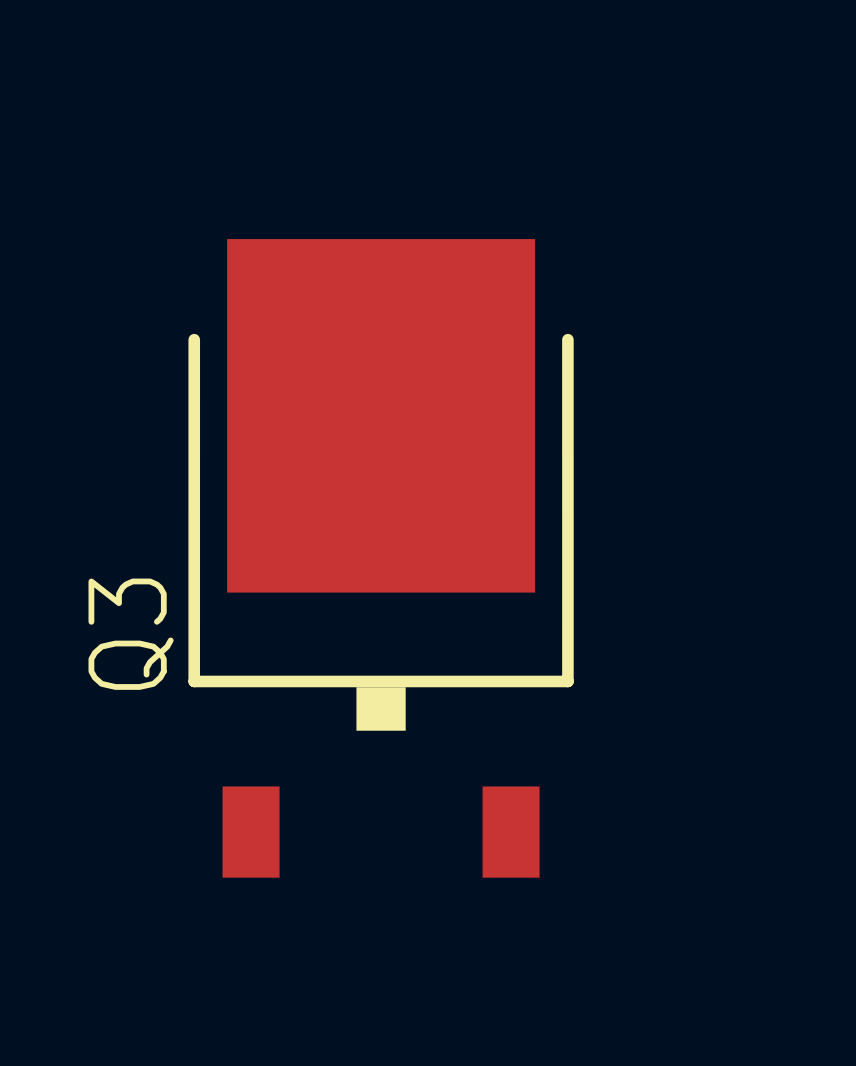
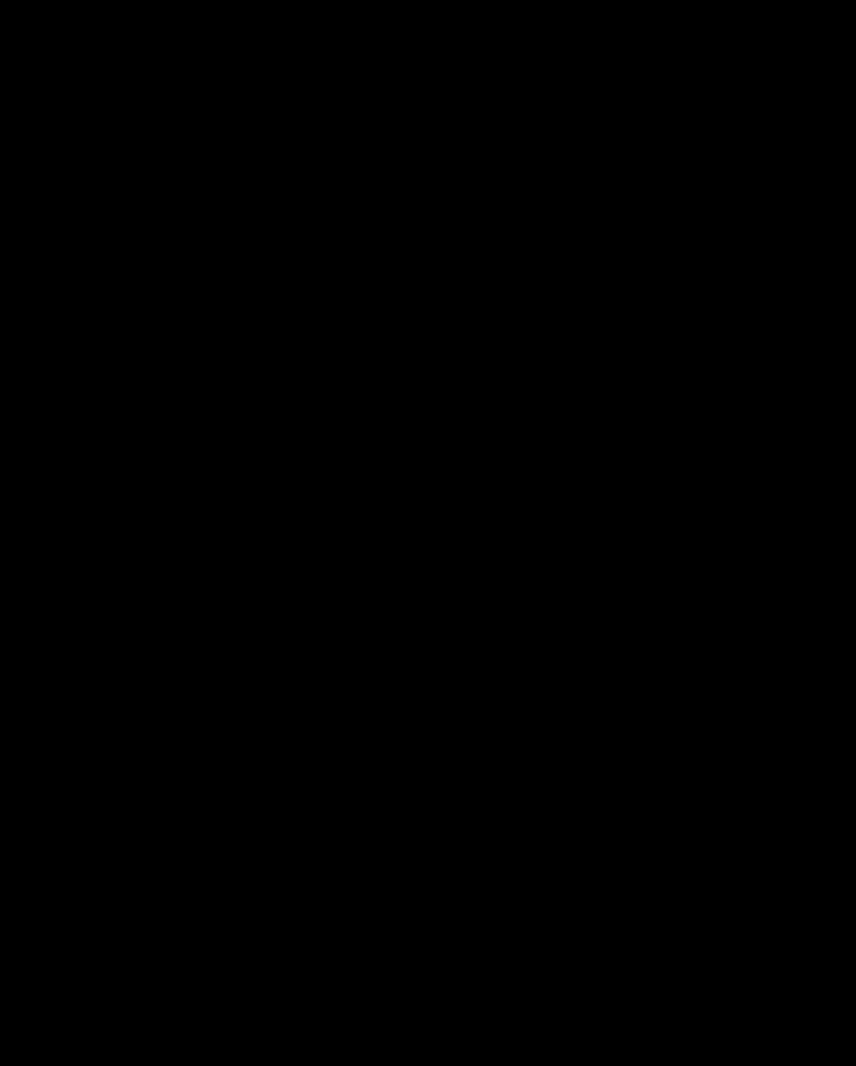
Q3: (381, 558) -> none

